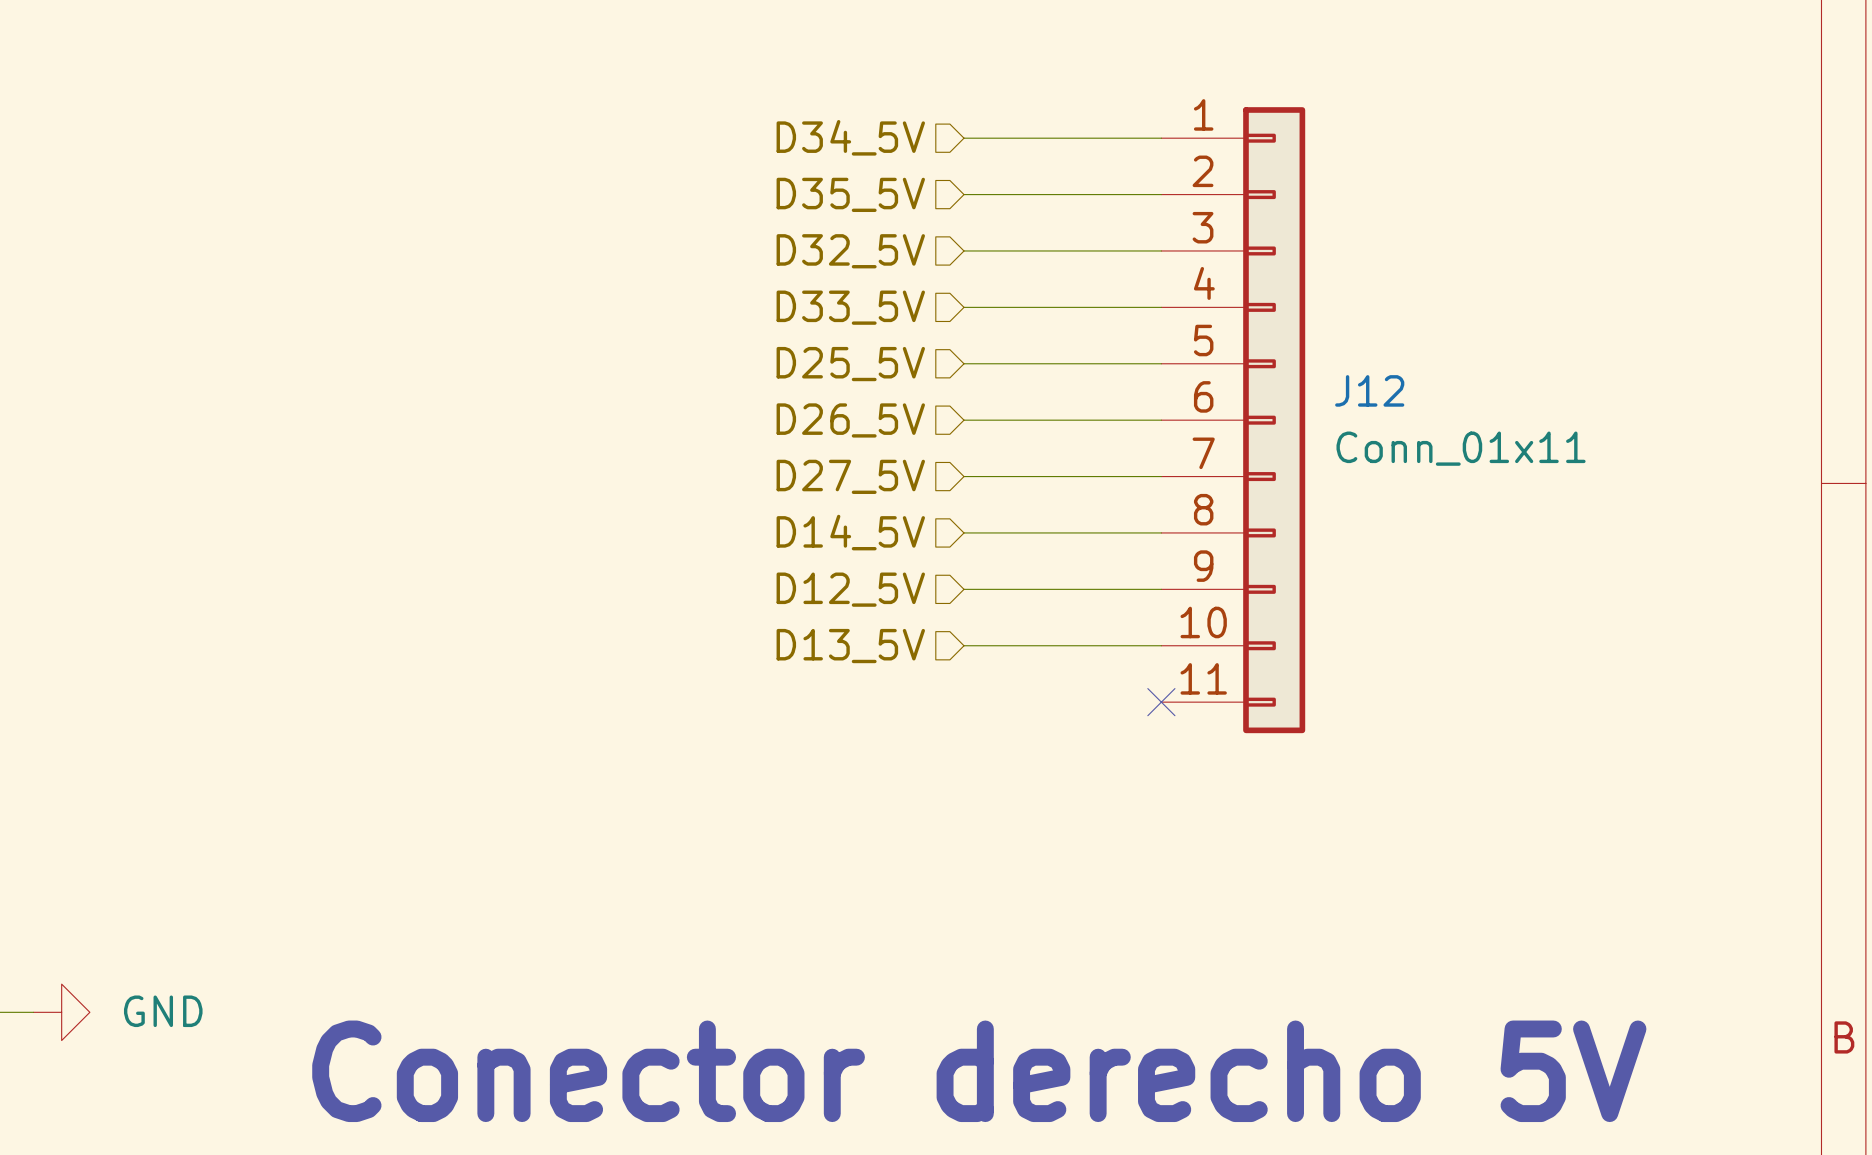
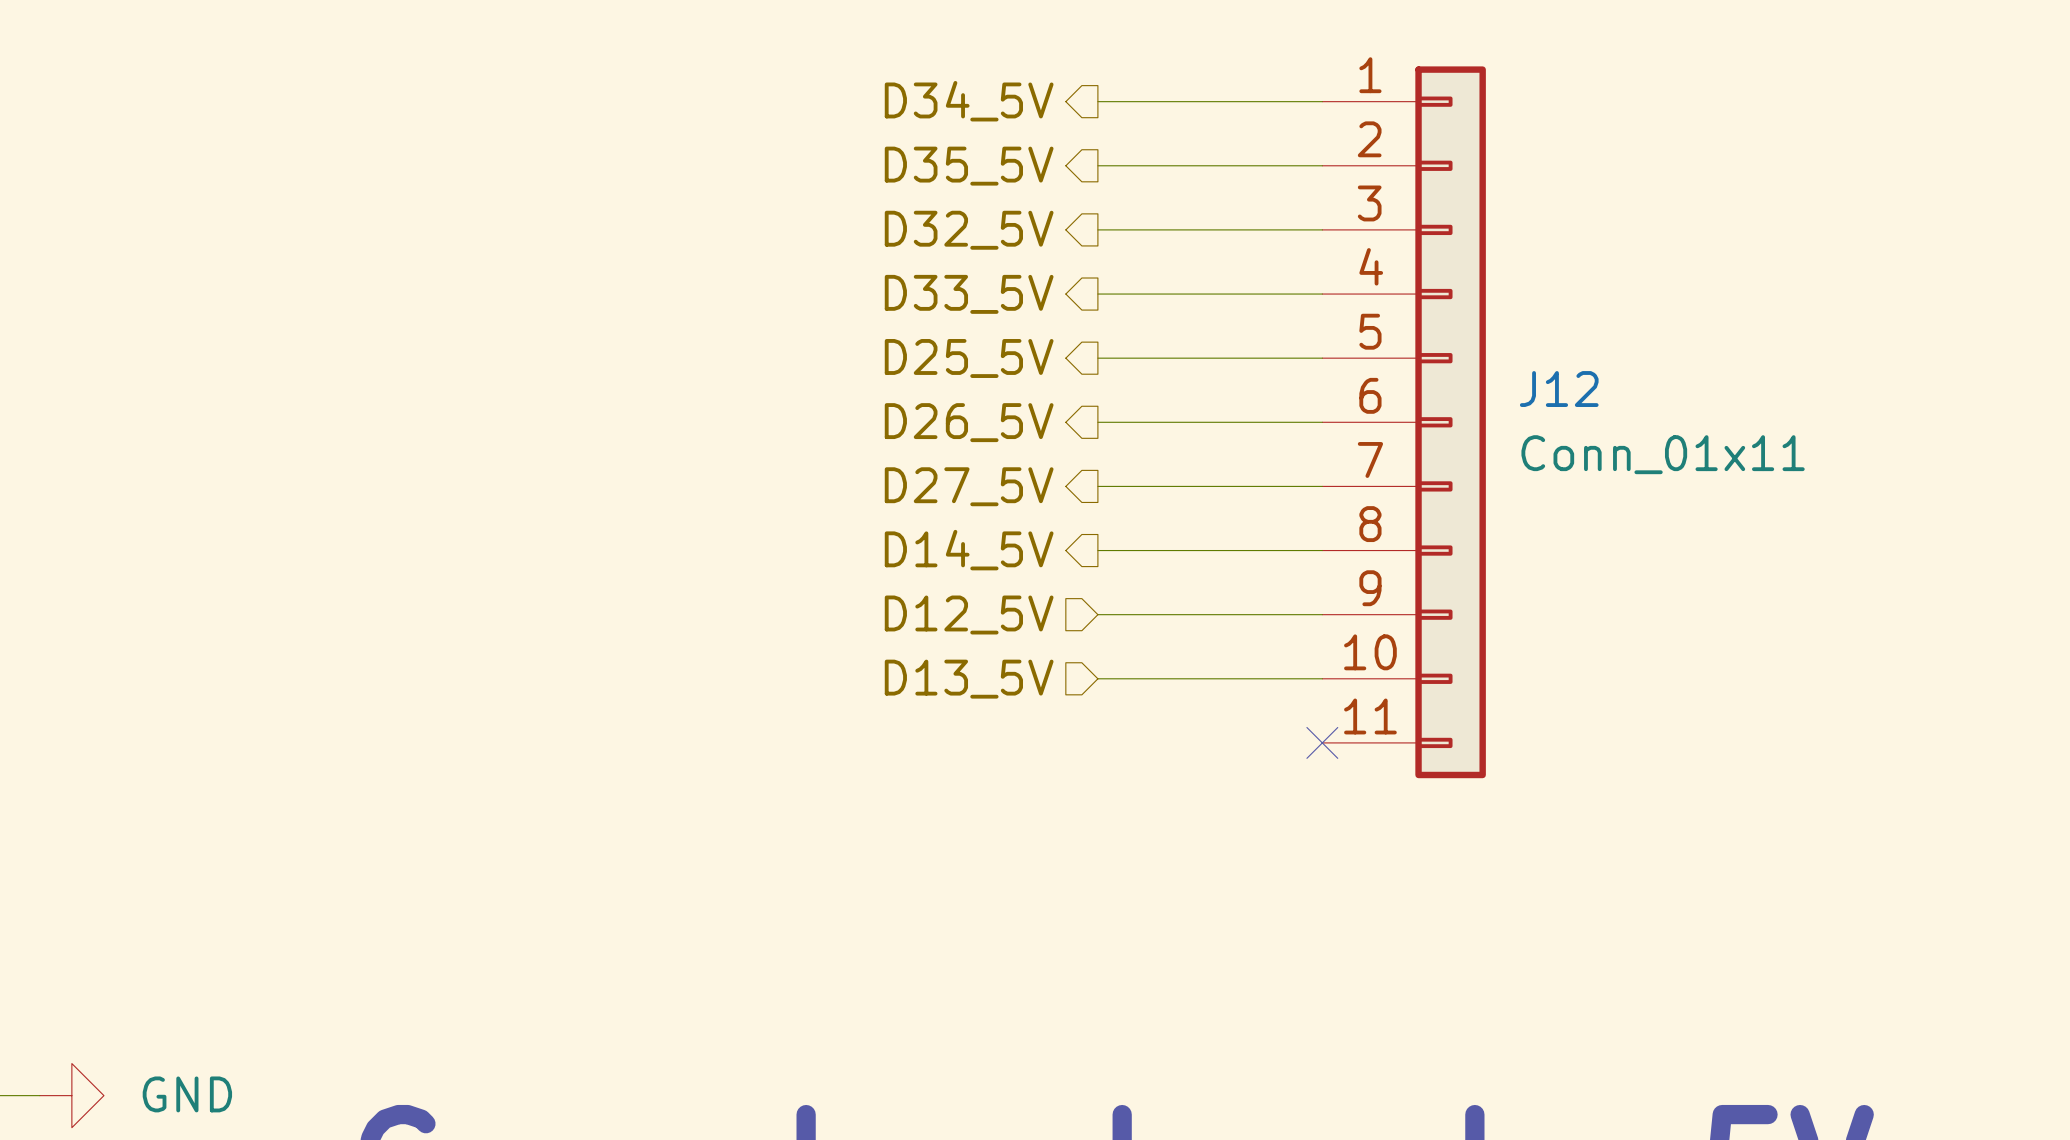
hierarchical label shape: input (850, 137) -> output (969, 101)
hierarchical label shape: input (850, 194) -> output (969, 166)
hierarchical label shape: input (850, 251) -> output (969, 230)
hierarchical label shape: input (850, 307) -> output (969, 294)
hierarchical label shape: input (850, 364) -> output (969, 358)
hierarchical label shape: input (850, 420) -> output (969, 422)
hierarchical label shape: input (850, 476) -> output (969, 486)
hierarchical label shape: input (850, 532) -> output (969, 550)

